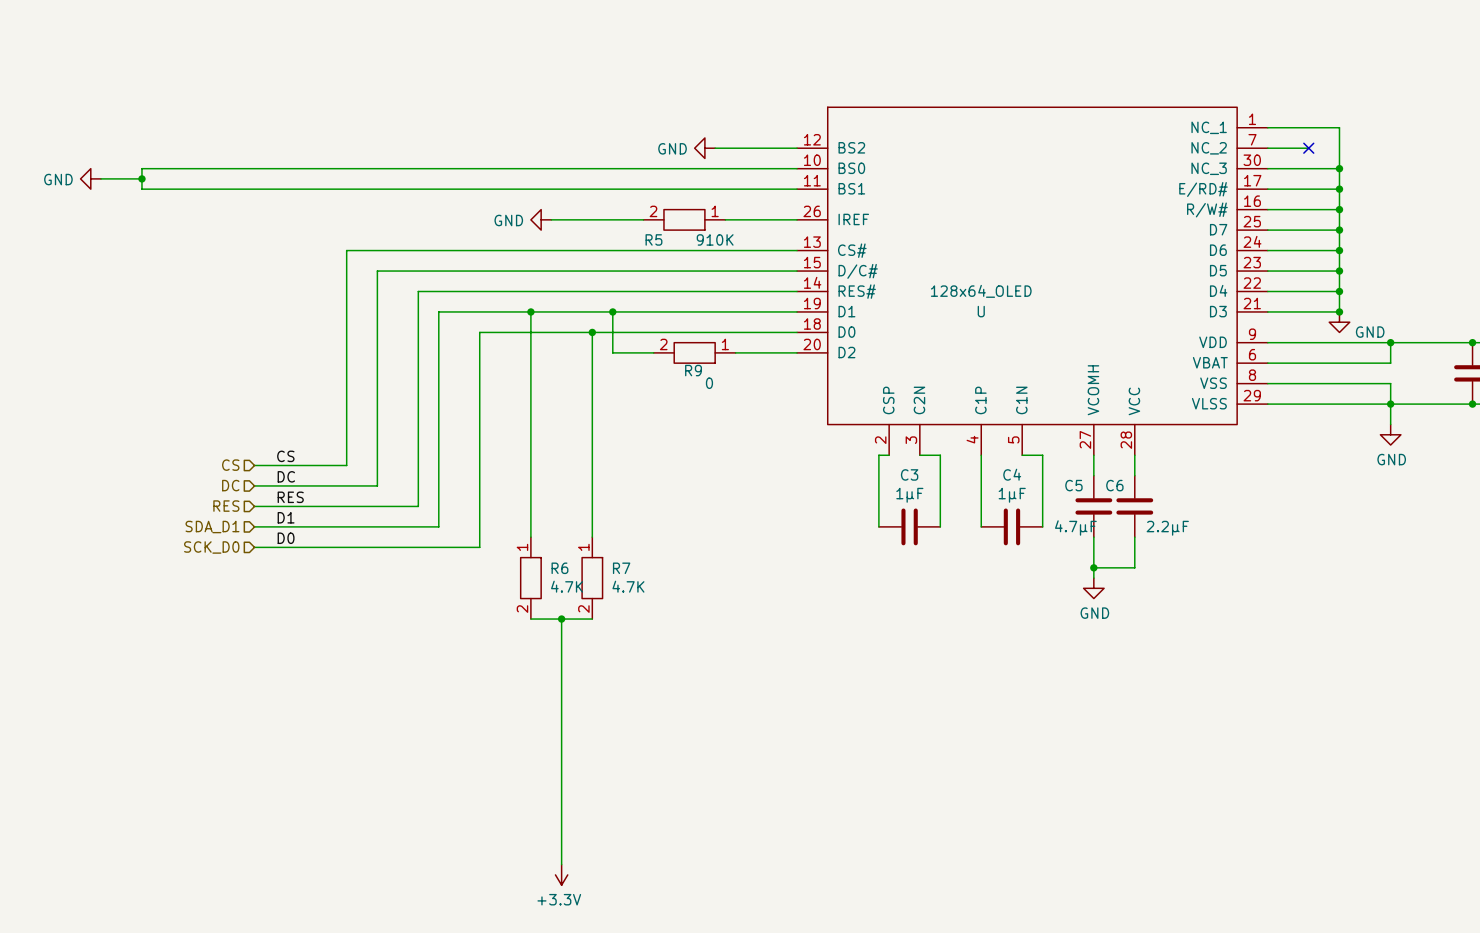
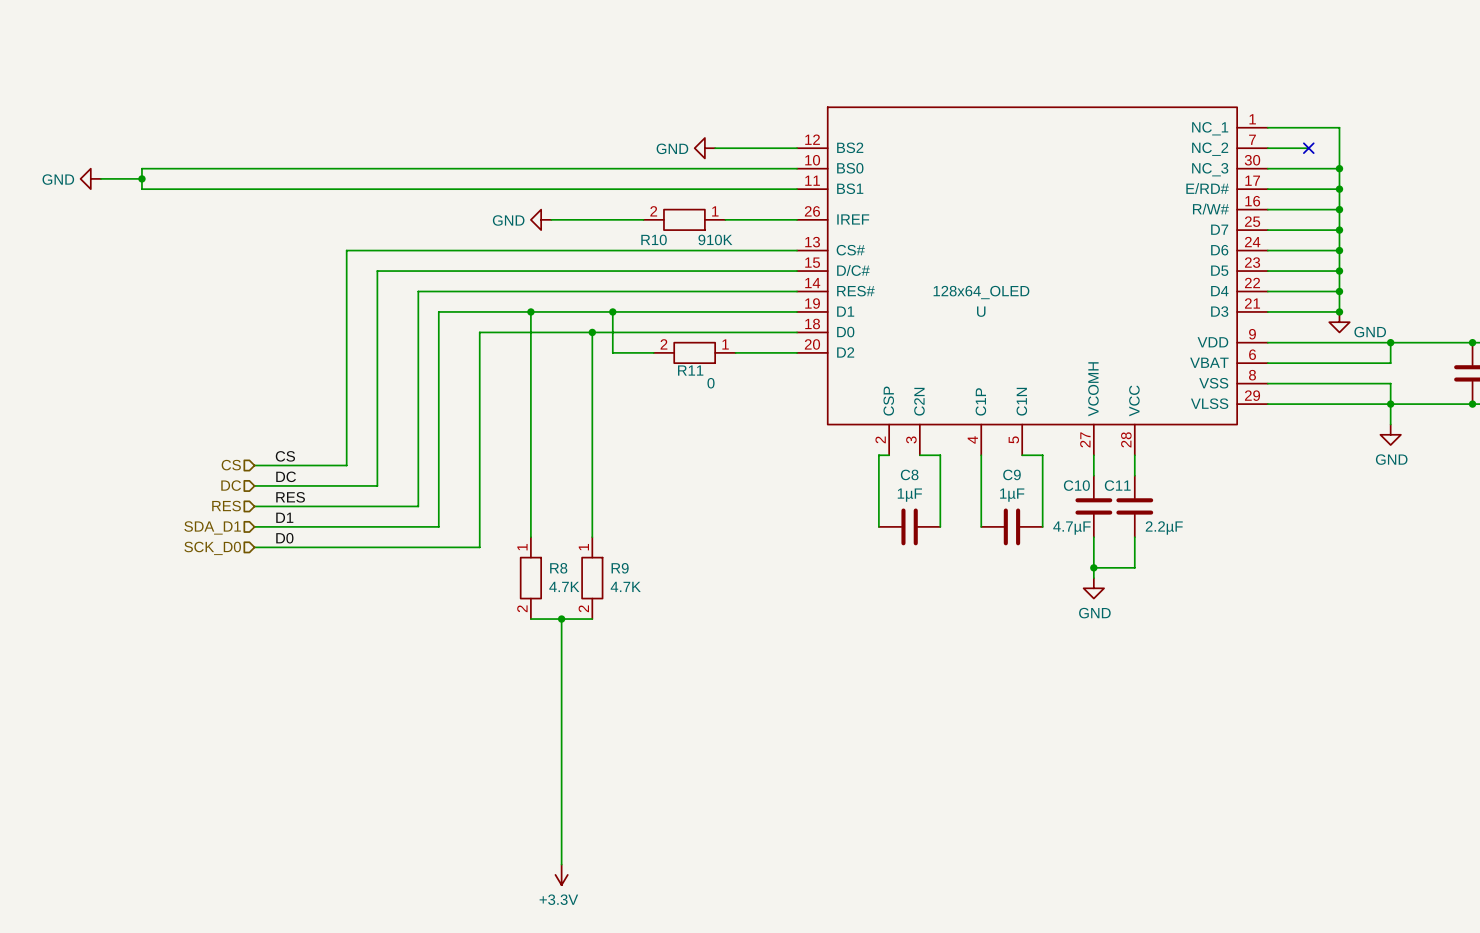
R5 name: R5 (653, 239) -> R10 (654, 239)
R9 name: R9 (693, 370) -> R11 (690, 370)
C3 name: C3 (909, 474) -> C8 (909, 474)
C4 name: C4 (1012, 474) -> C9 (1011, 474)
C5 name: C5 (1073, 485) -> C10 (1076, 485)
C6 name: C6 (1114, 485) -> C11 (1117, 485)
R6 name: R6 (559, 568) -> R8 (558, 568)
R7 name: R7 (621, 568) -> R9 (620, 568)

